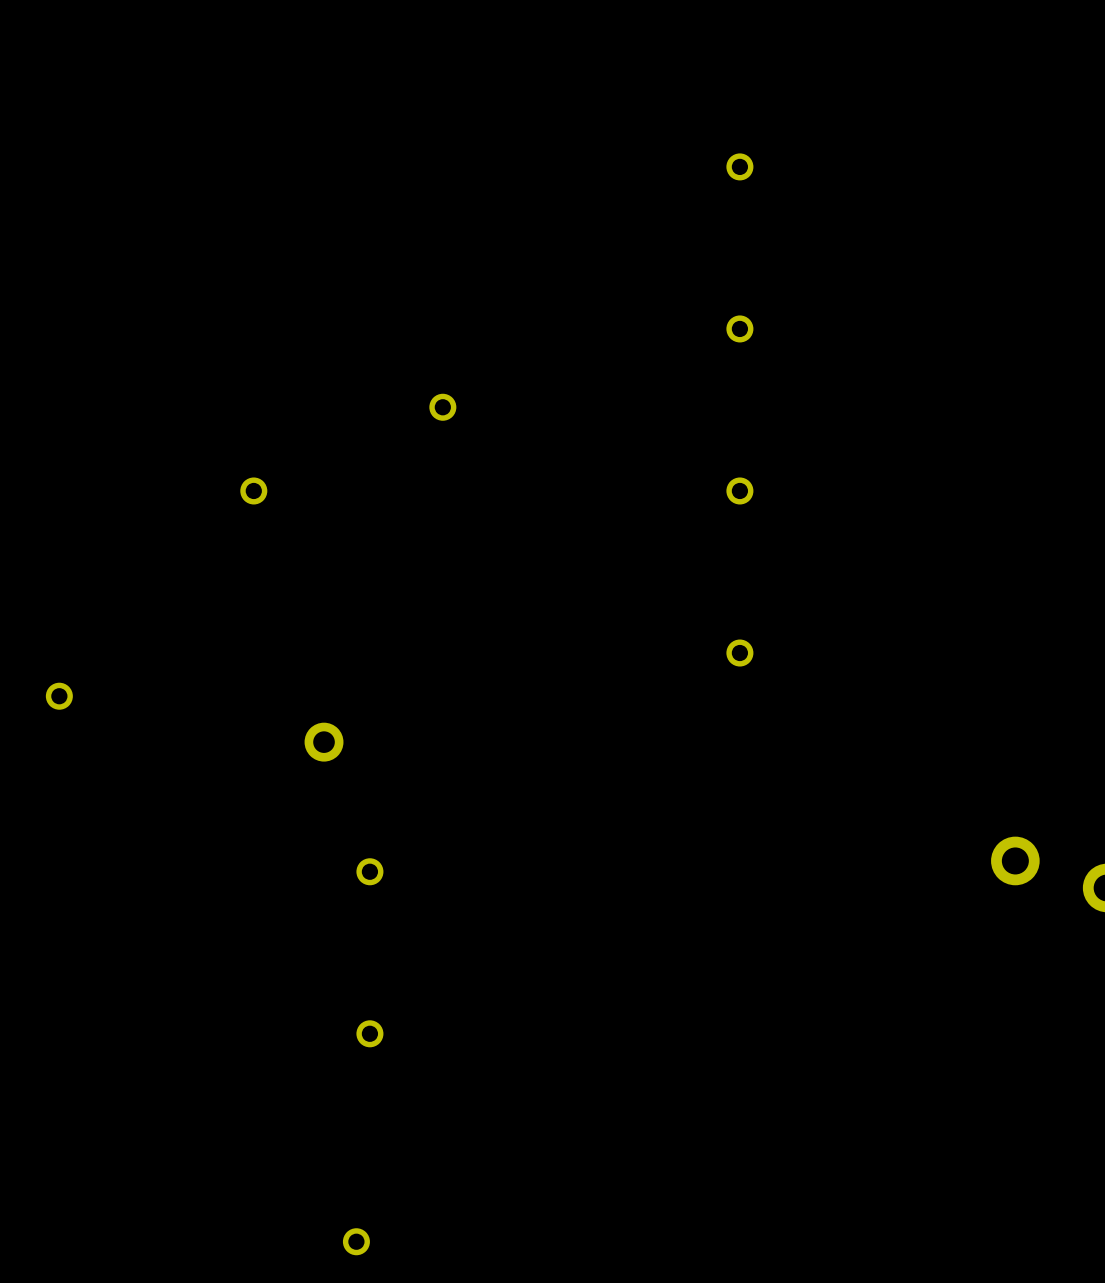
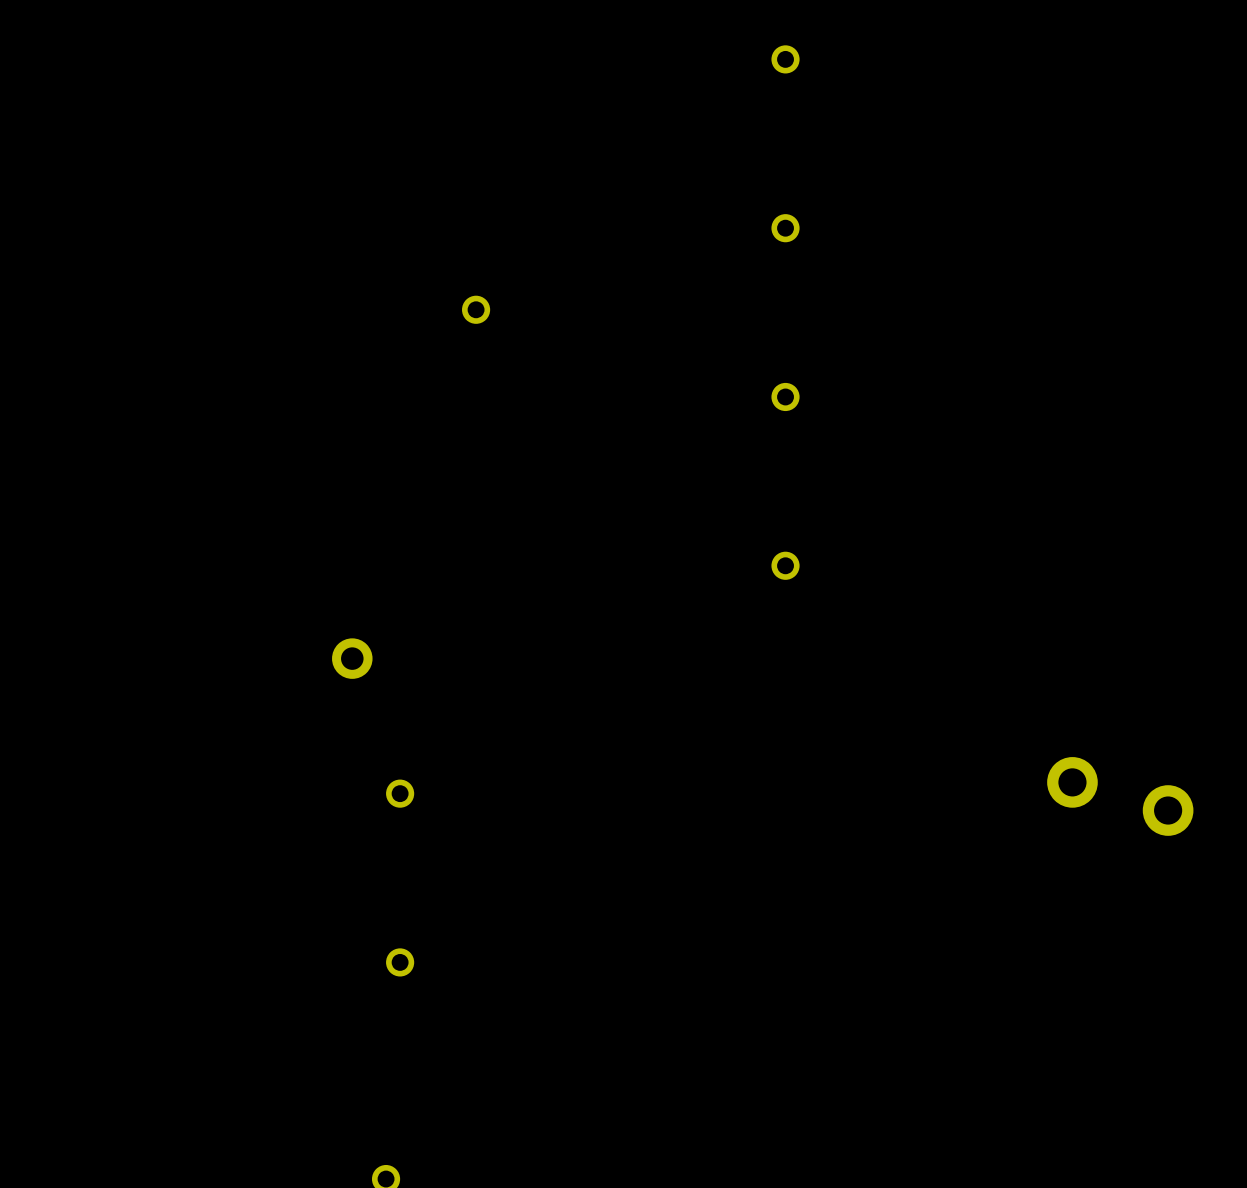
part: (253, 490) -> none
part: (59, 696) -> none

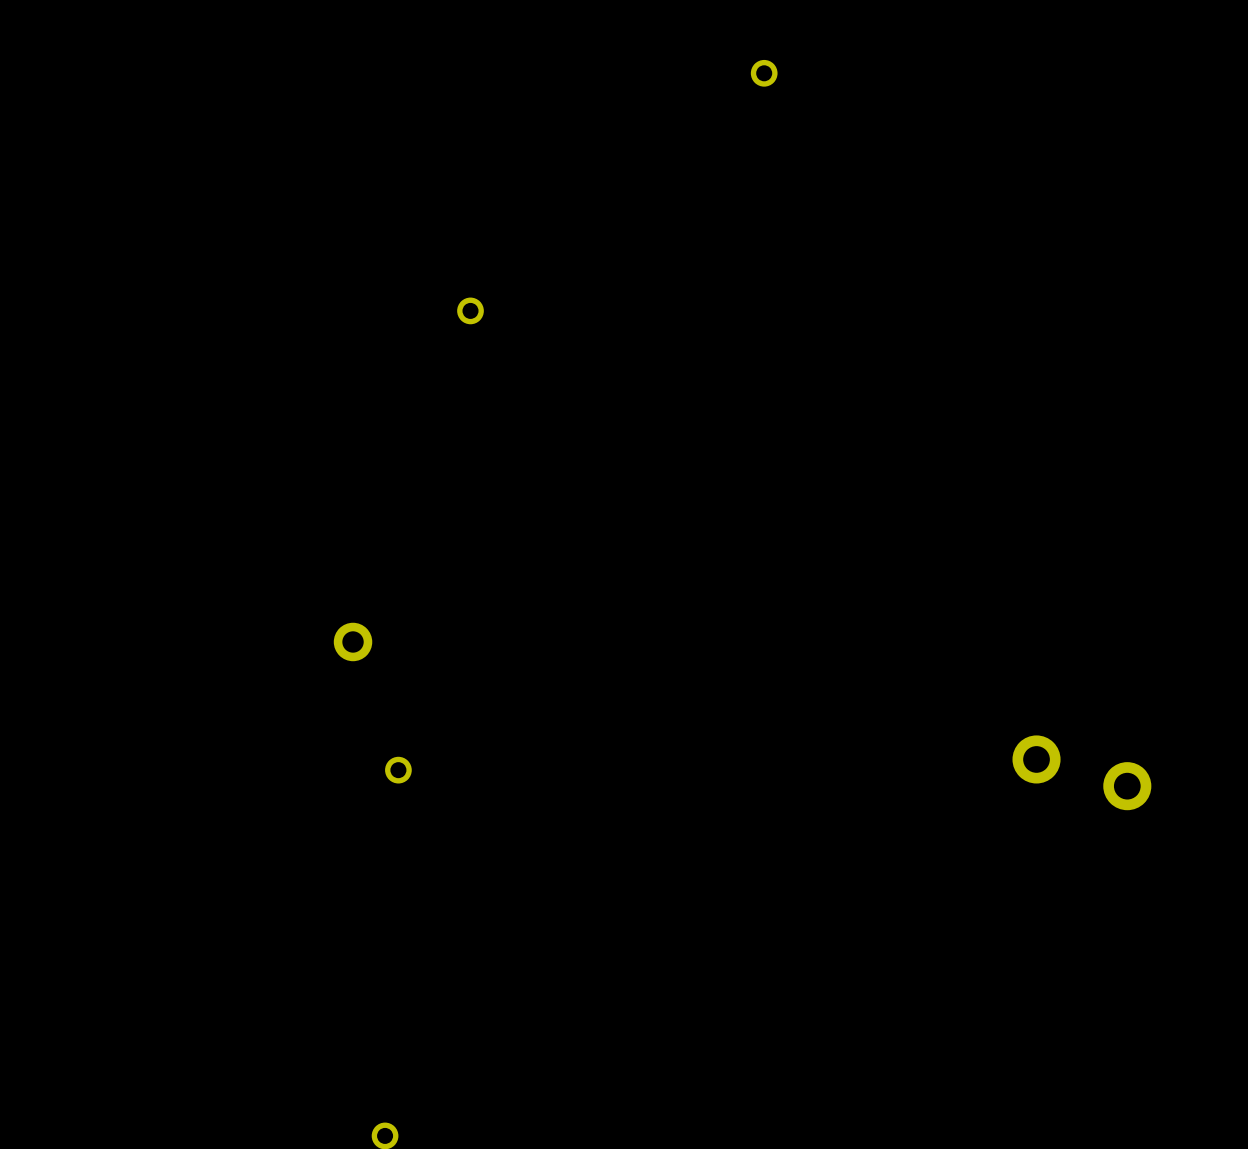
part: (785, 228) -> none
part: (785, 396) -> none
part: (785, 565) -> none
part: (400, 962) -> none

